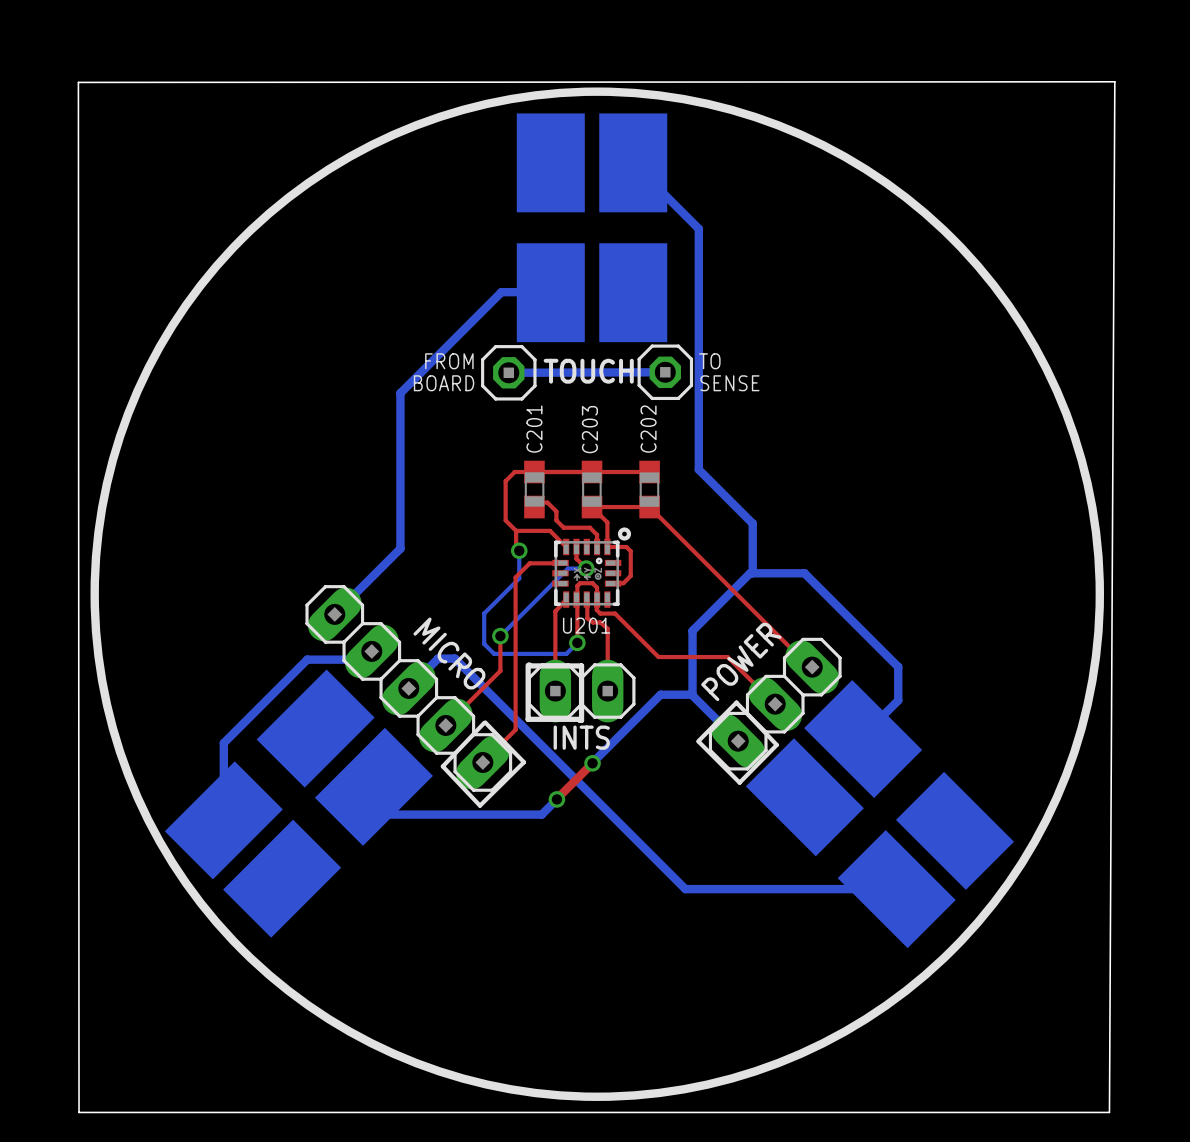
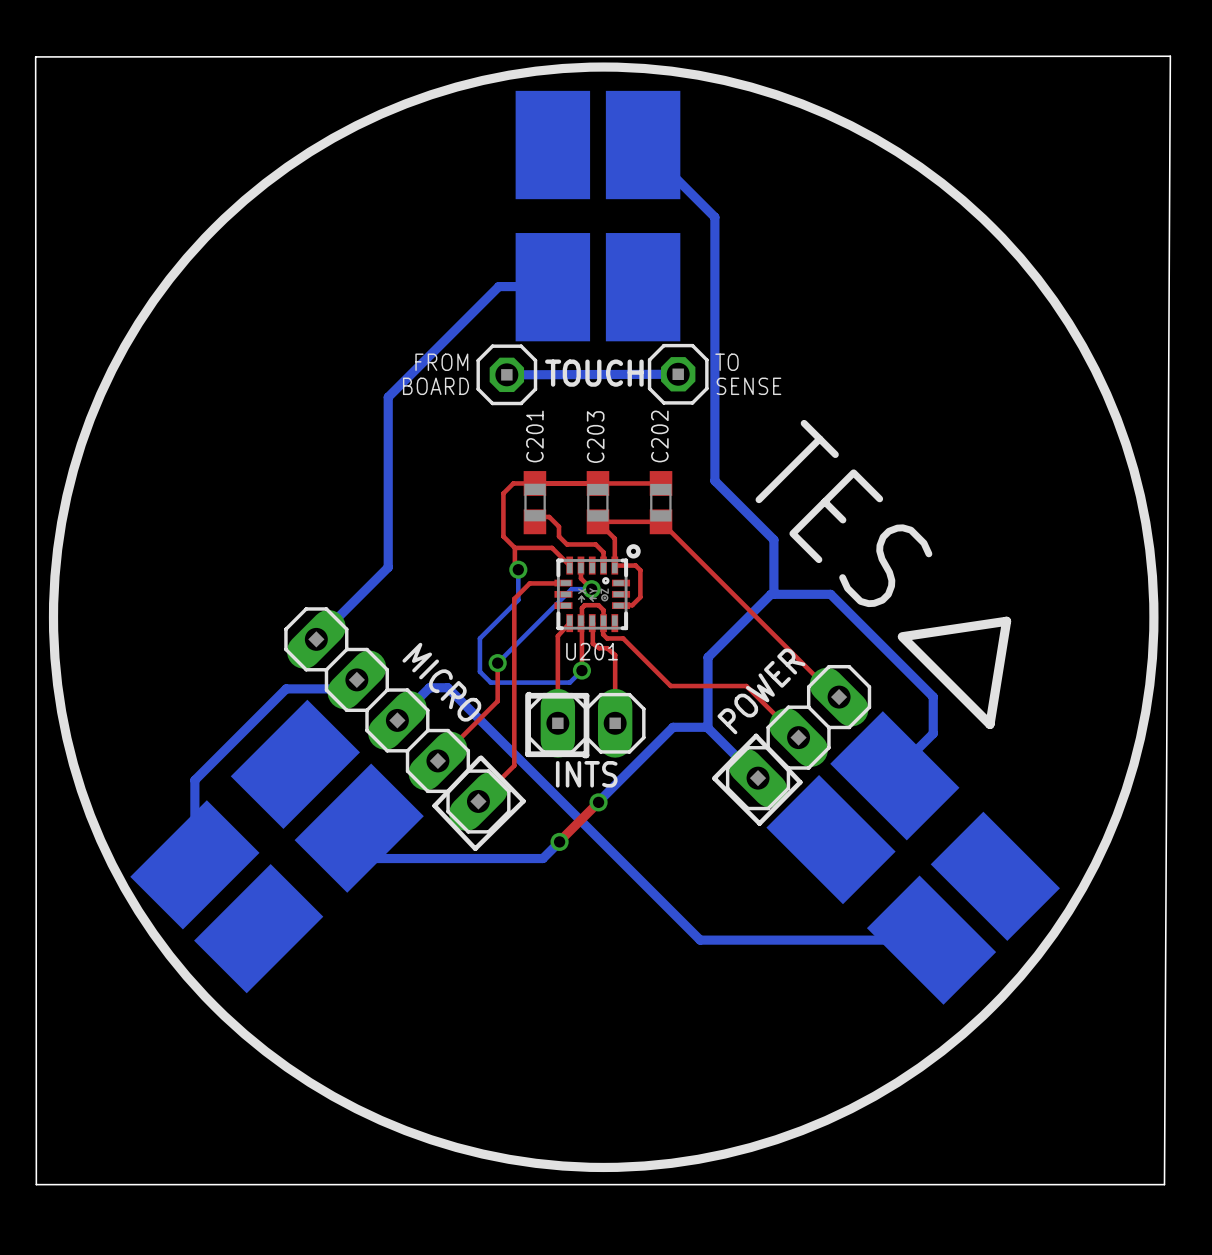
text: none -> TES (843, 513)
line: none -> (902, 636) (1006, 621) (989, 724) (903, 637)

